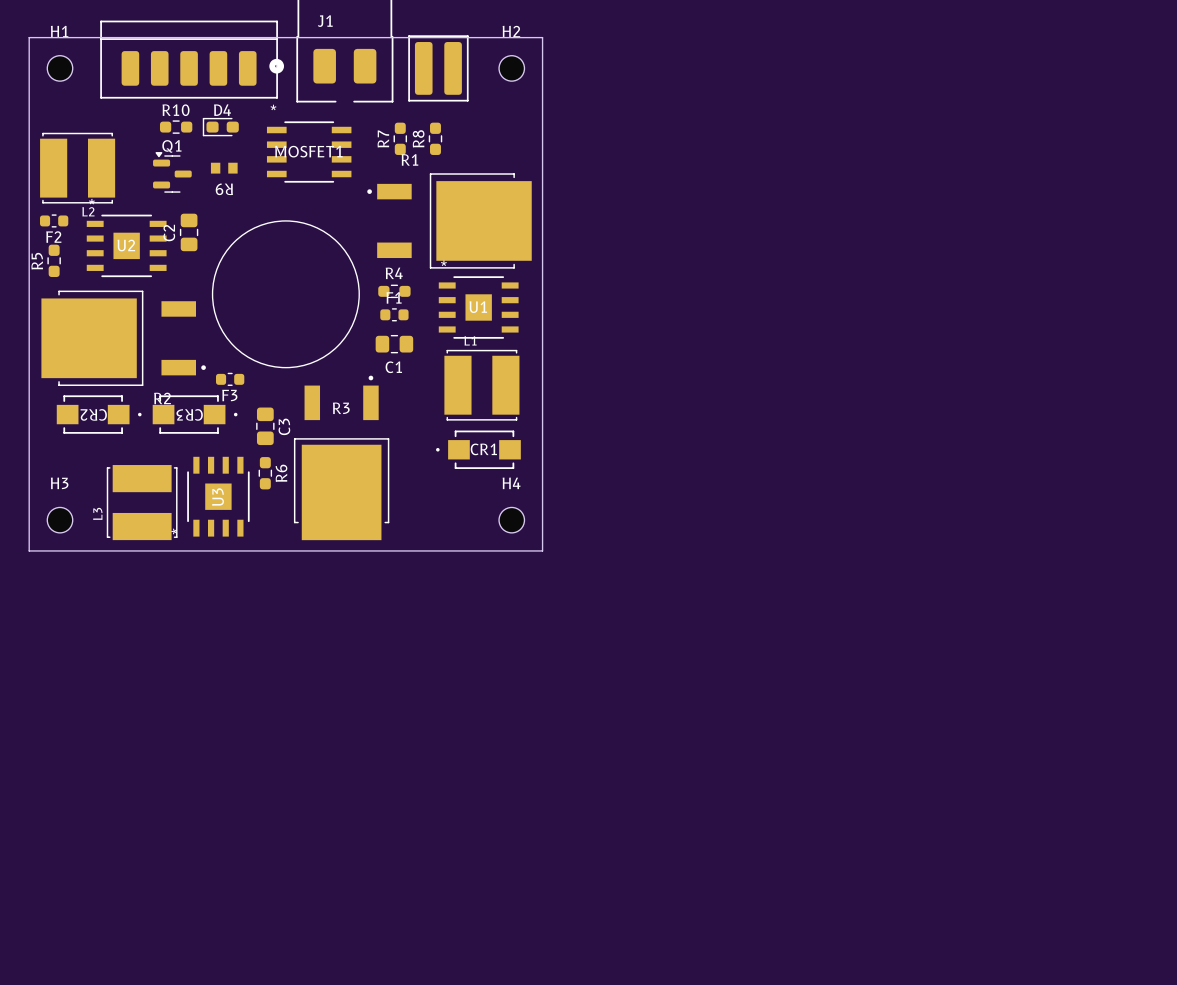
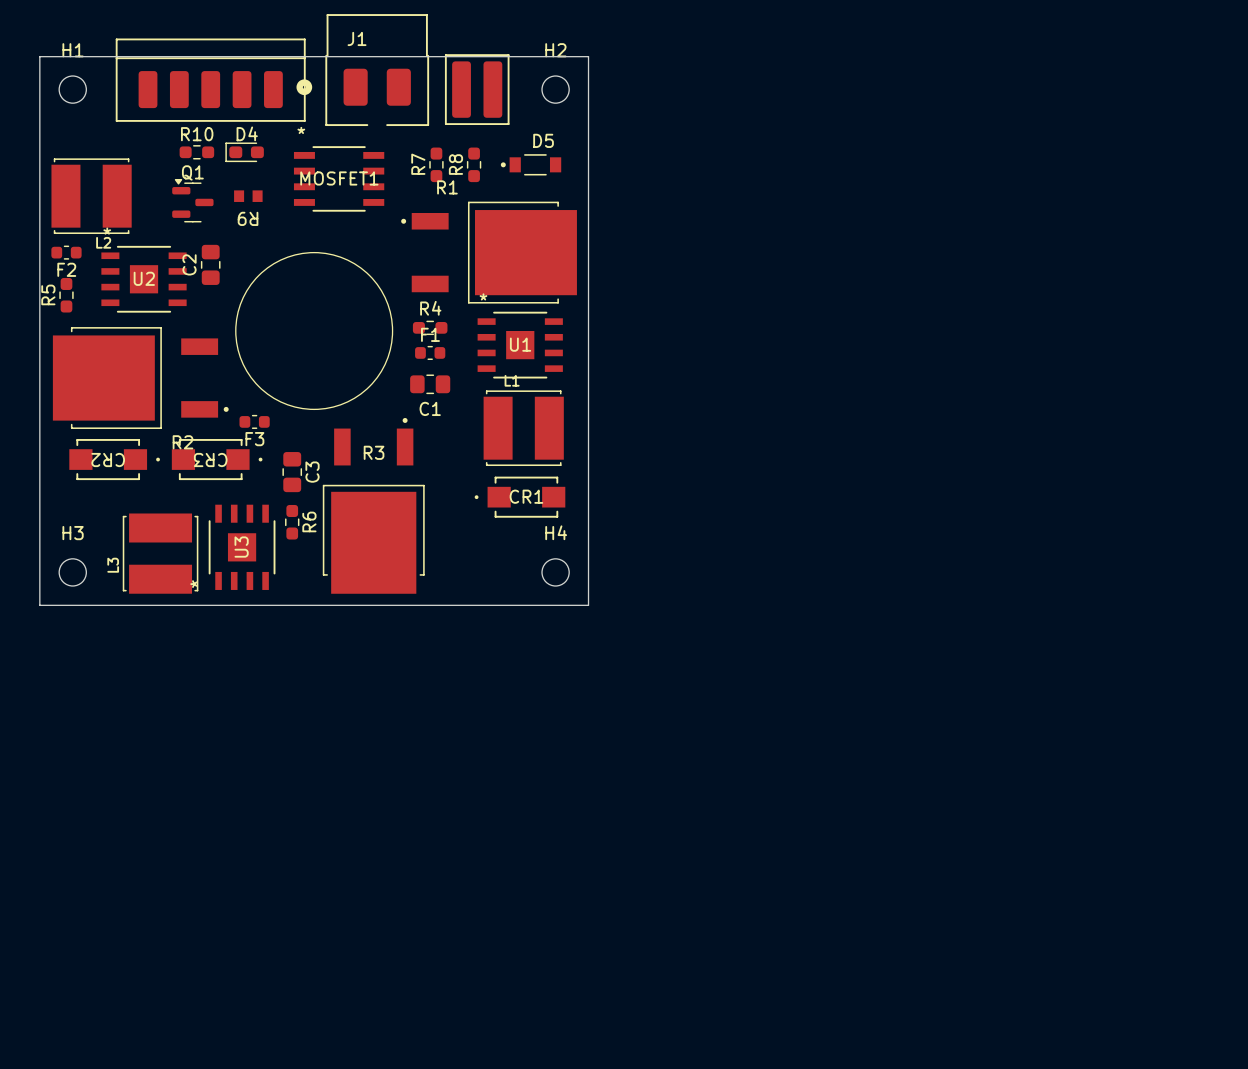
D5: none -> (531, 164)

